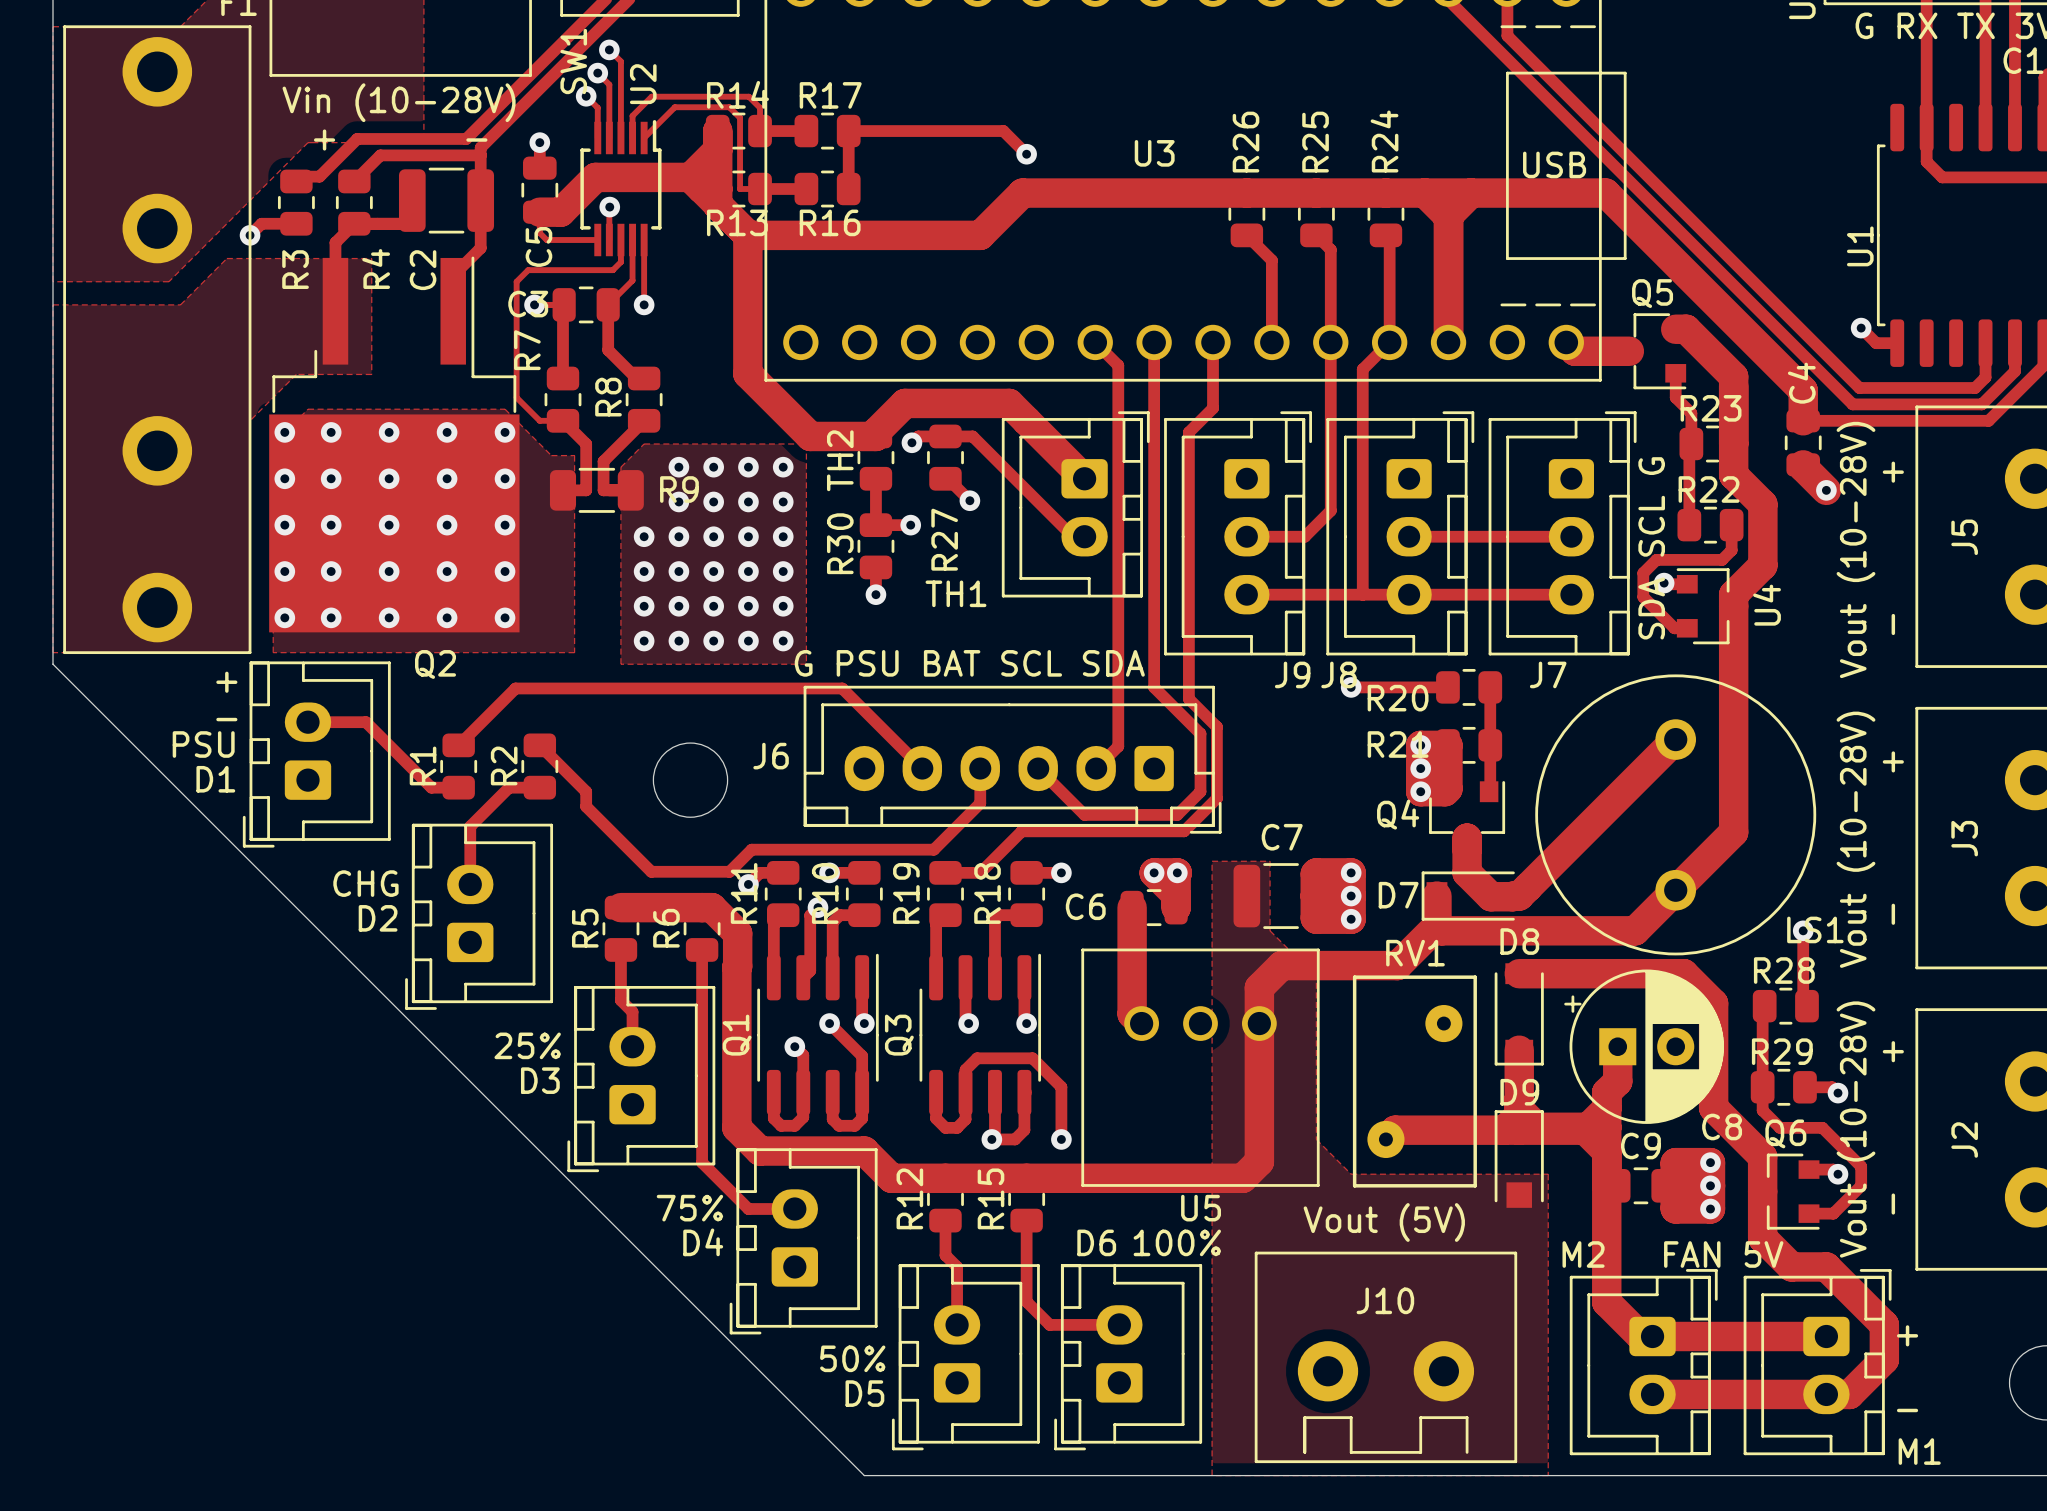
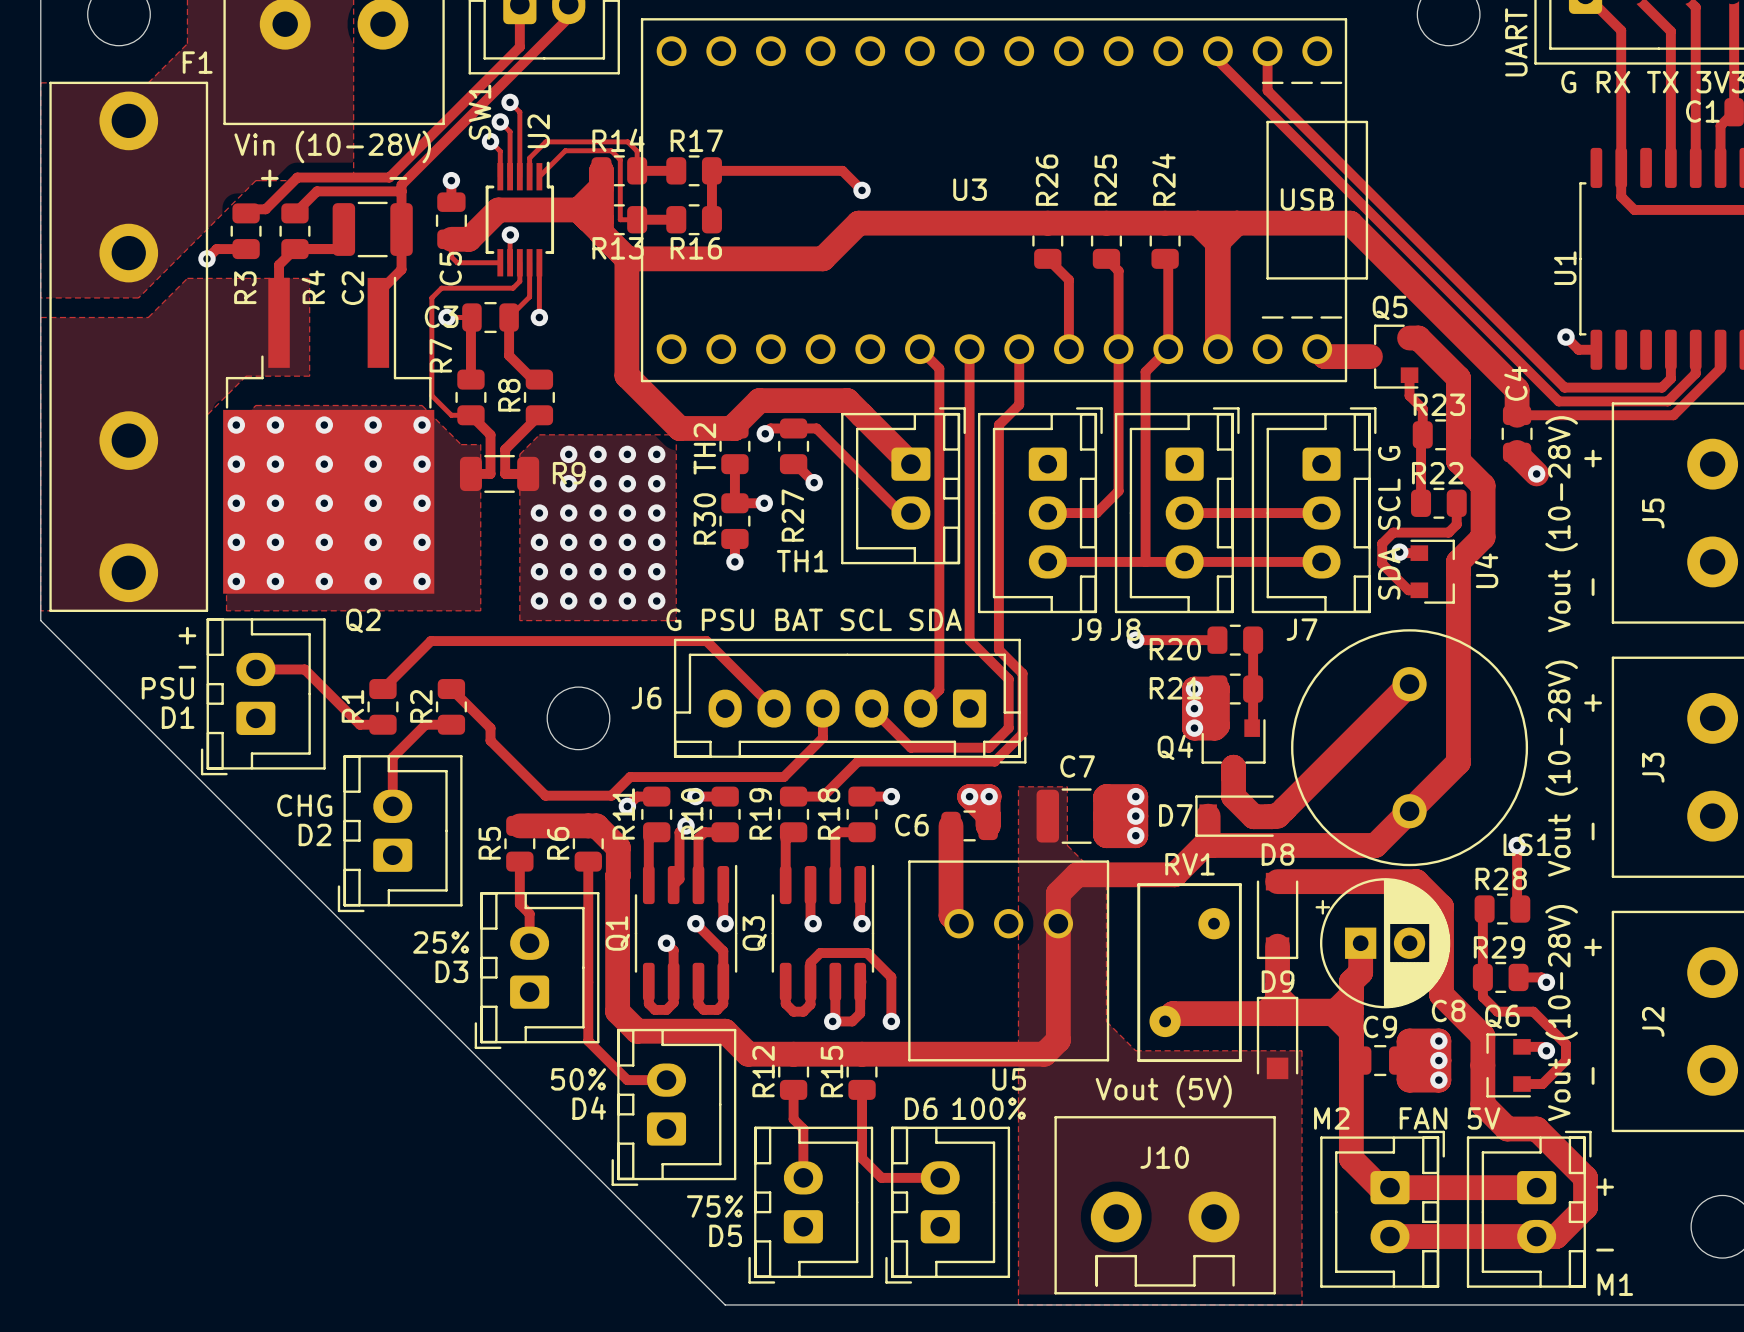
text: 75% (689, 1208) -> 50% (578, 1079)
text: 50% (852, 1358) -> 75% (714, 1206)

